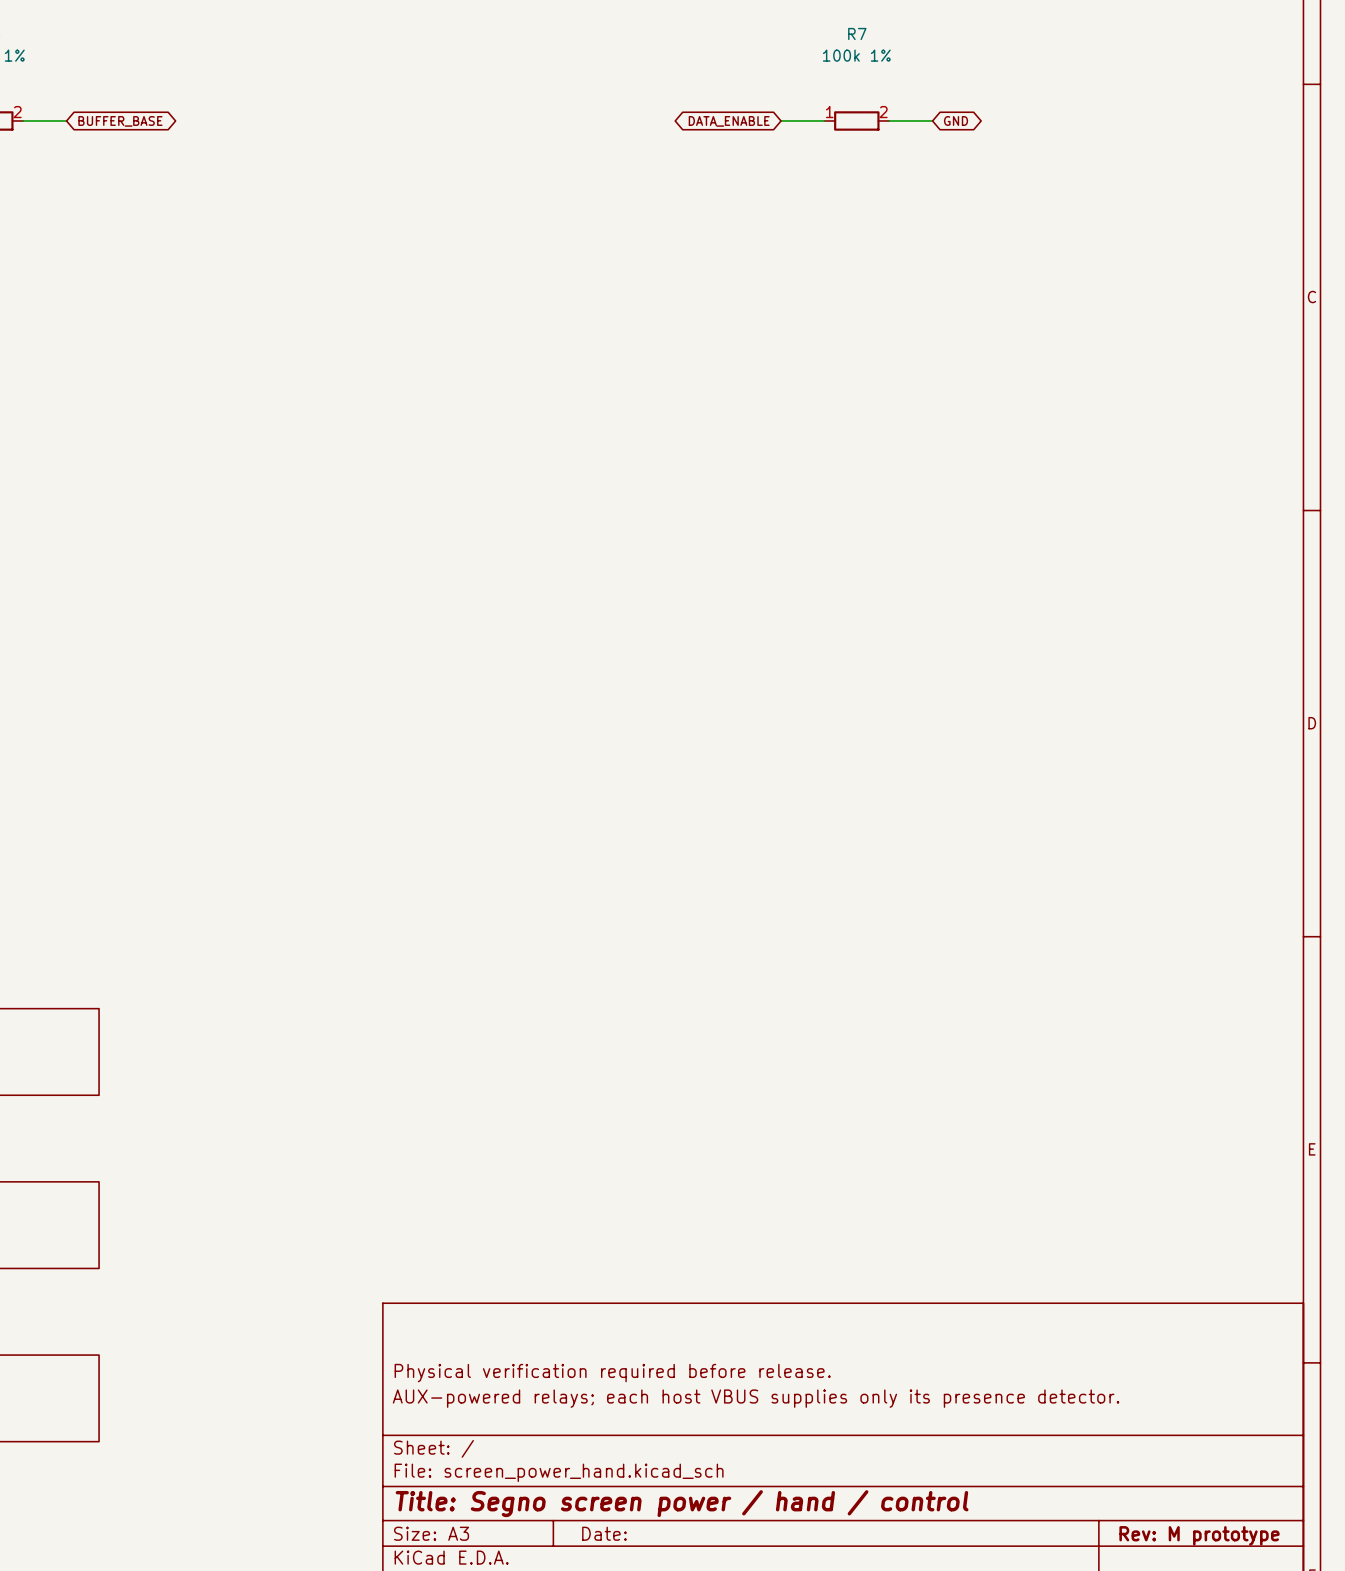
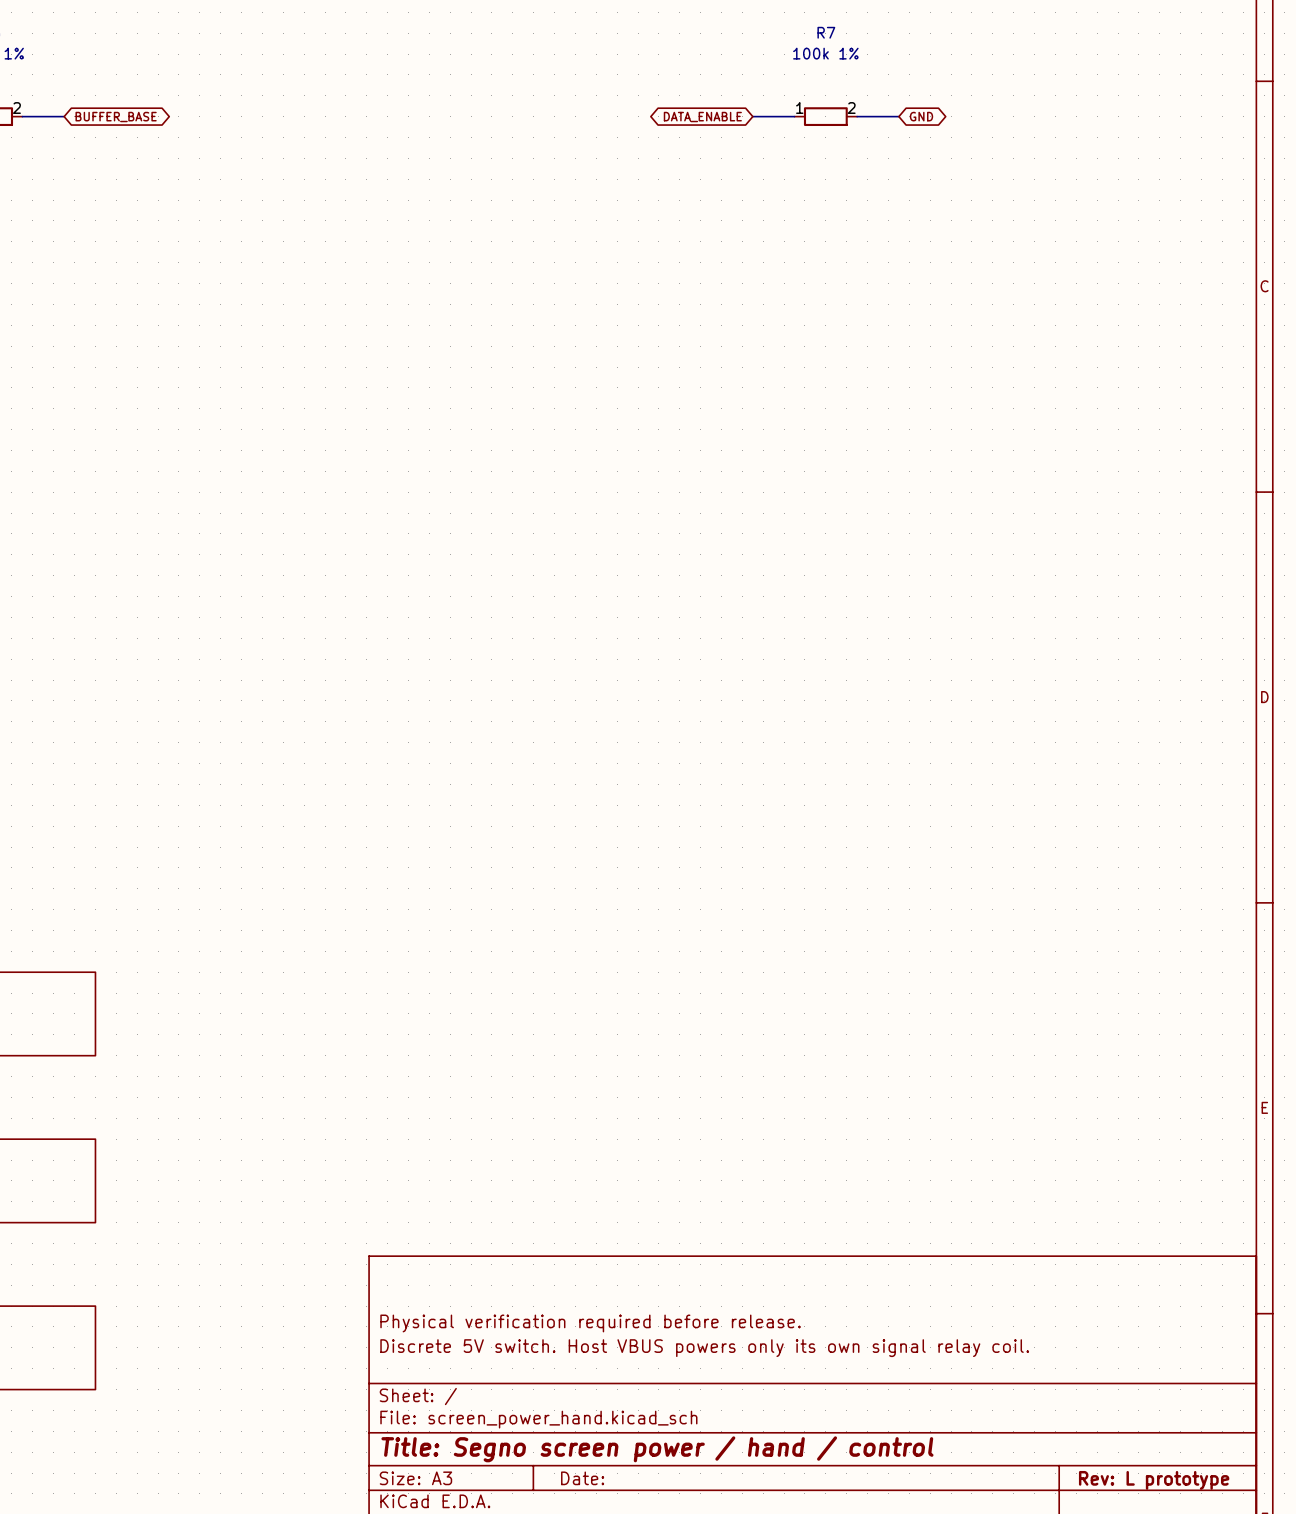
title block: AUX-powered relays; each host VBUS supplies only its presence detector. (756, 1398) -> Discrete 5V switch. Host VBUS powers only its own signal relay coil. (704, 1348)
title block: Rev: M prototype (1199, 1535) -> Rev: L prototype (1154, 1480)

